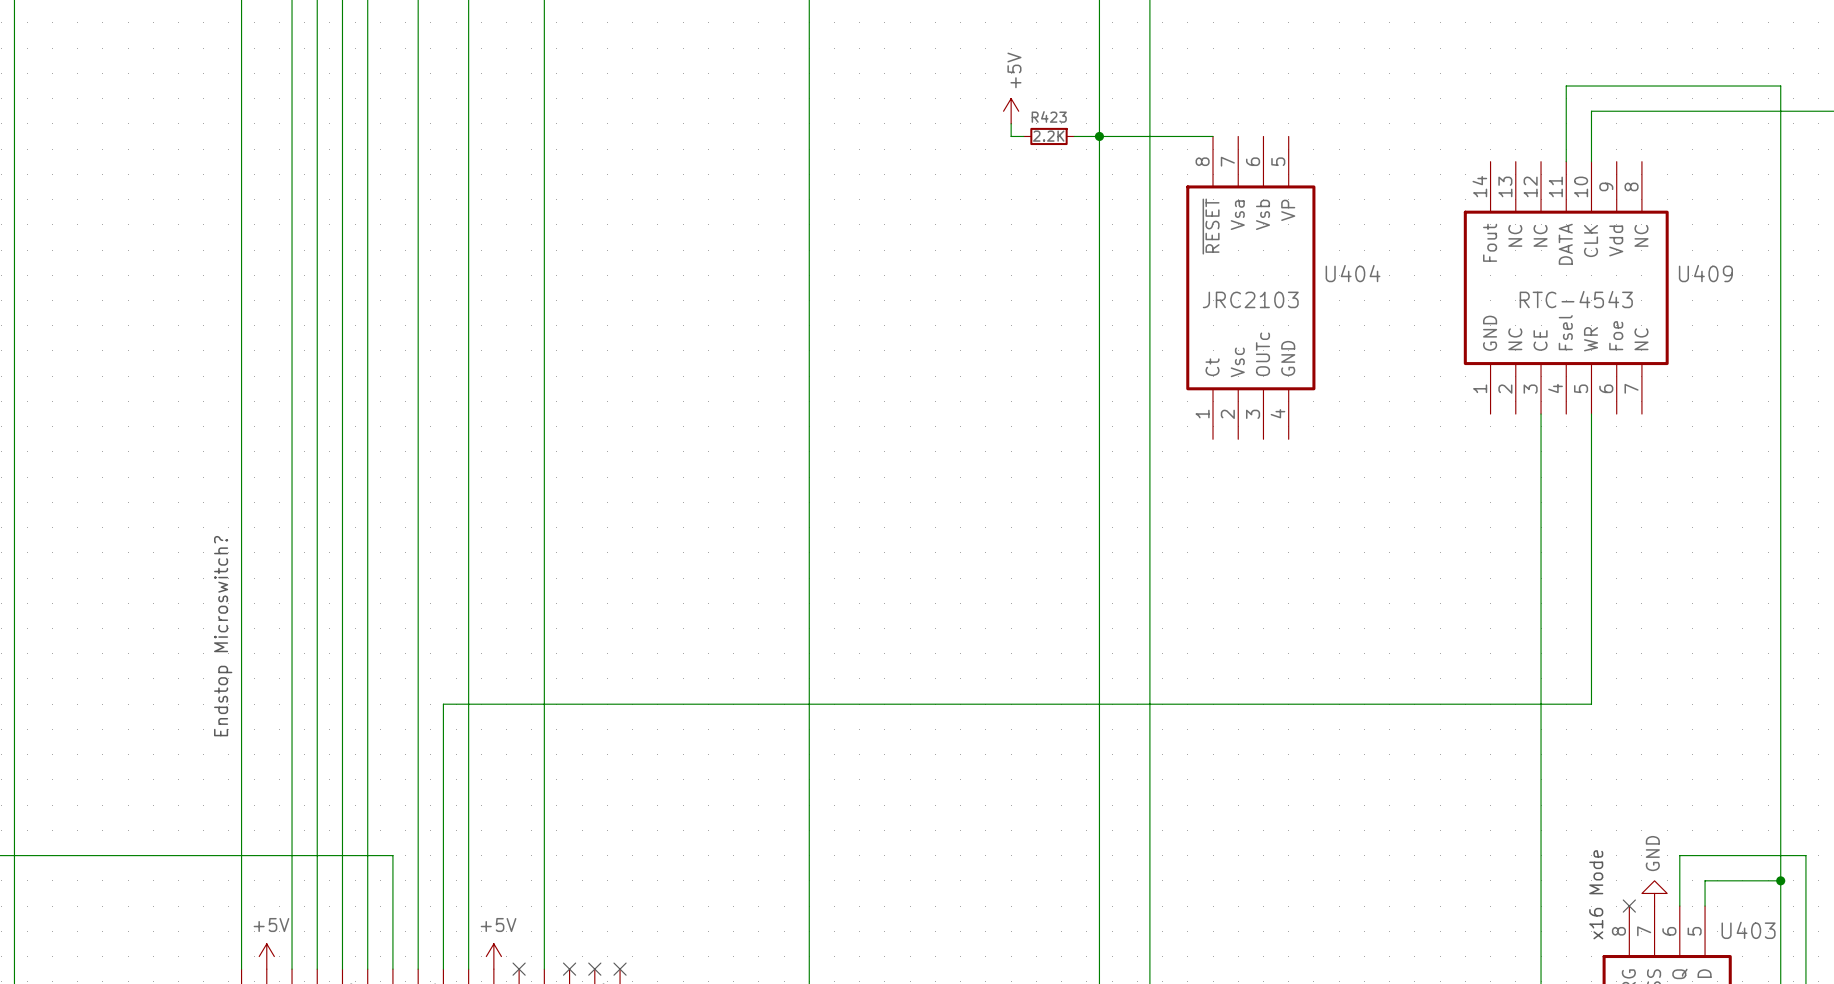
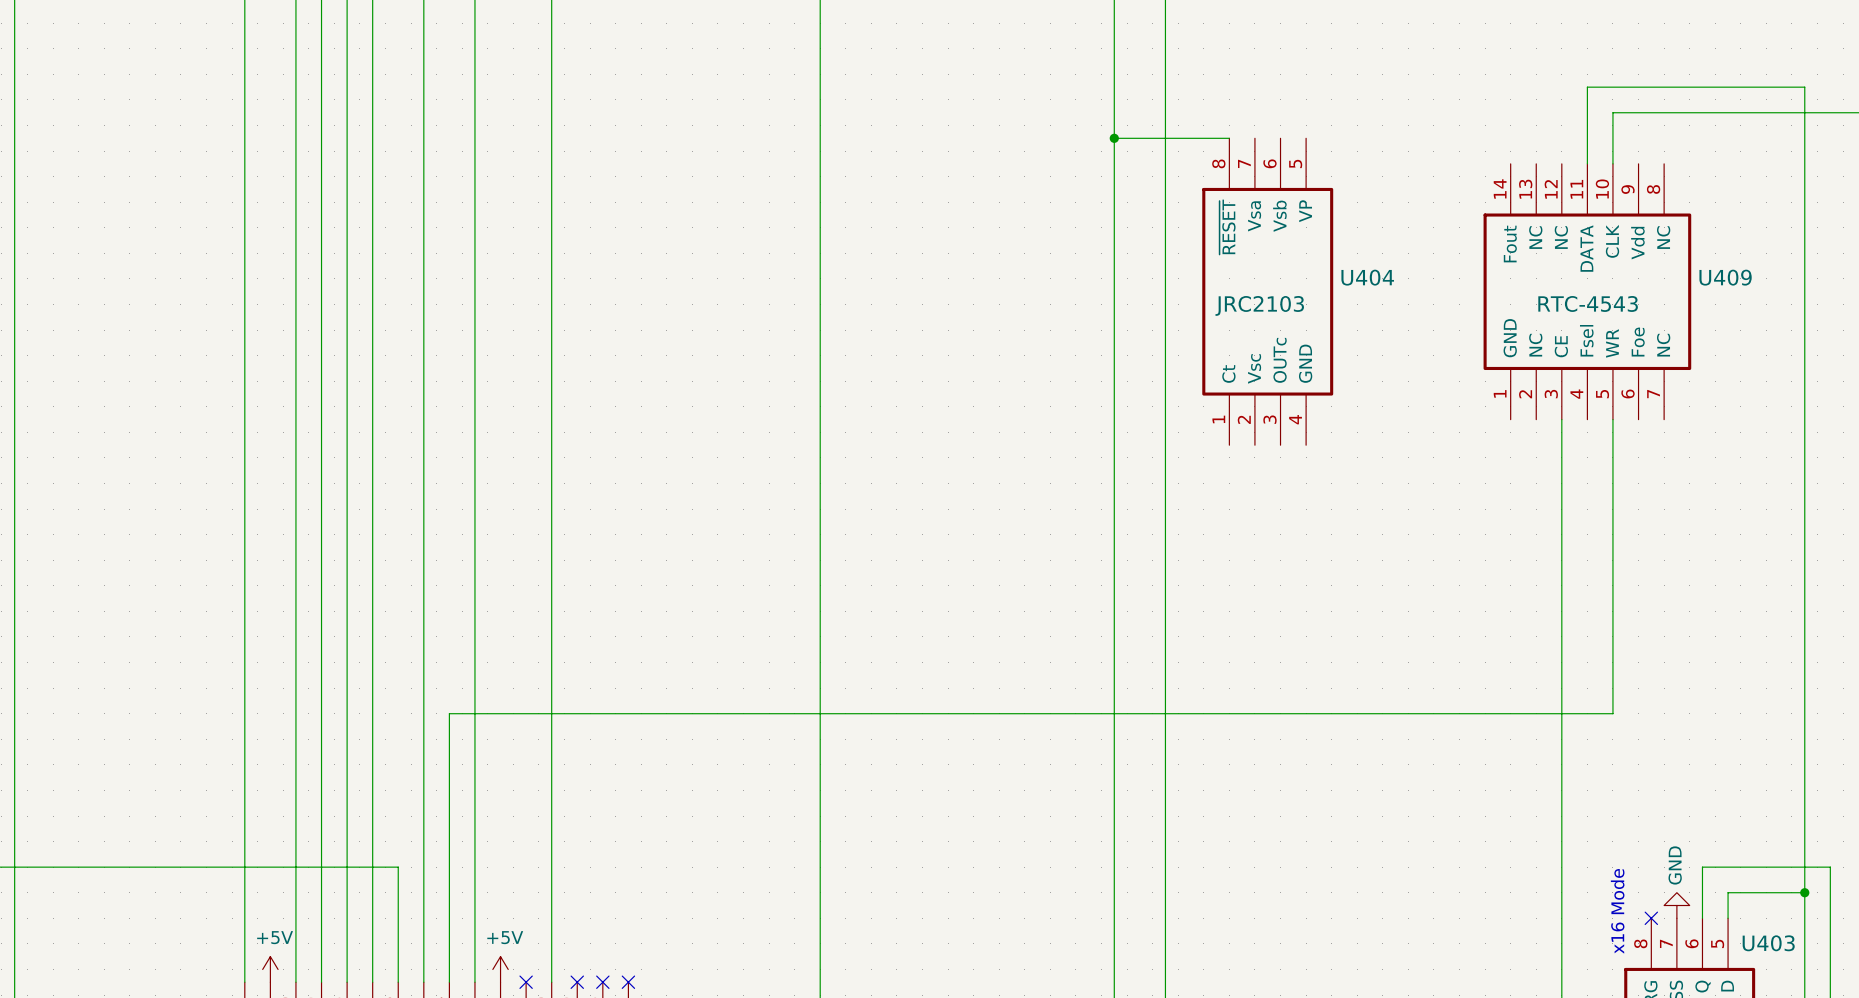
power symbol: +5V (1011, 111) -> none
wire: (1011, 123) (1011, 136) (1023, 136) -> none
R423: 2.2K (1048, 136) -> none
wire: (1074, 136) (1099, 136) -> none
text: Endstop Microswitch? (223, 636) -> none

